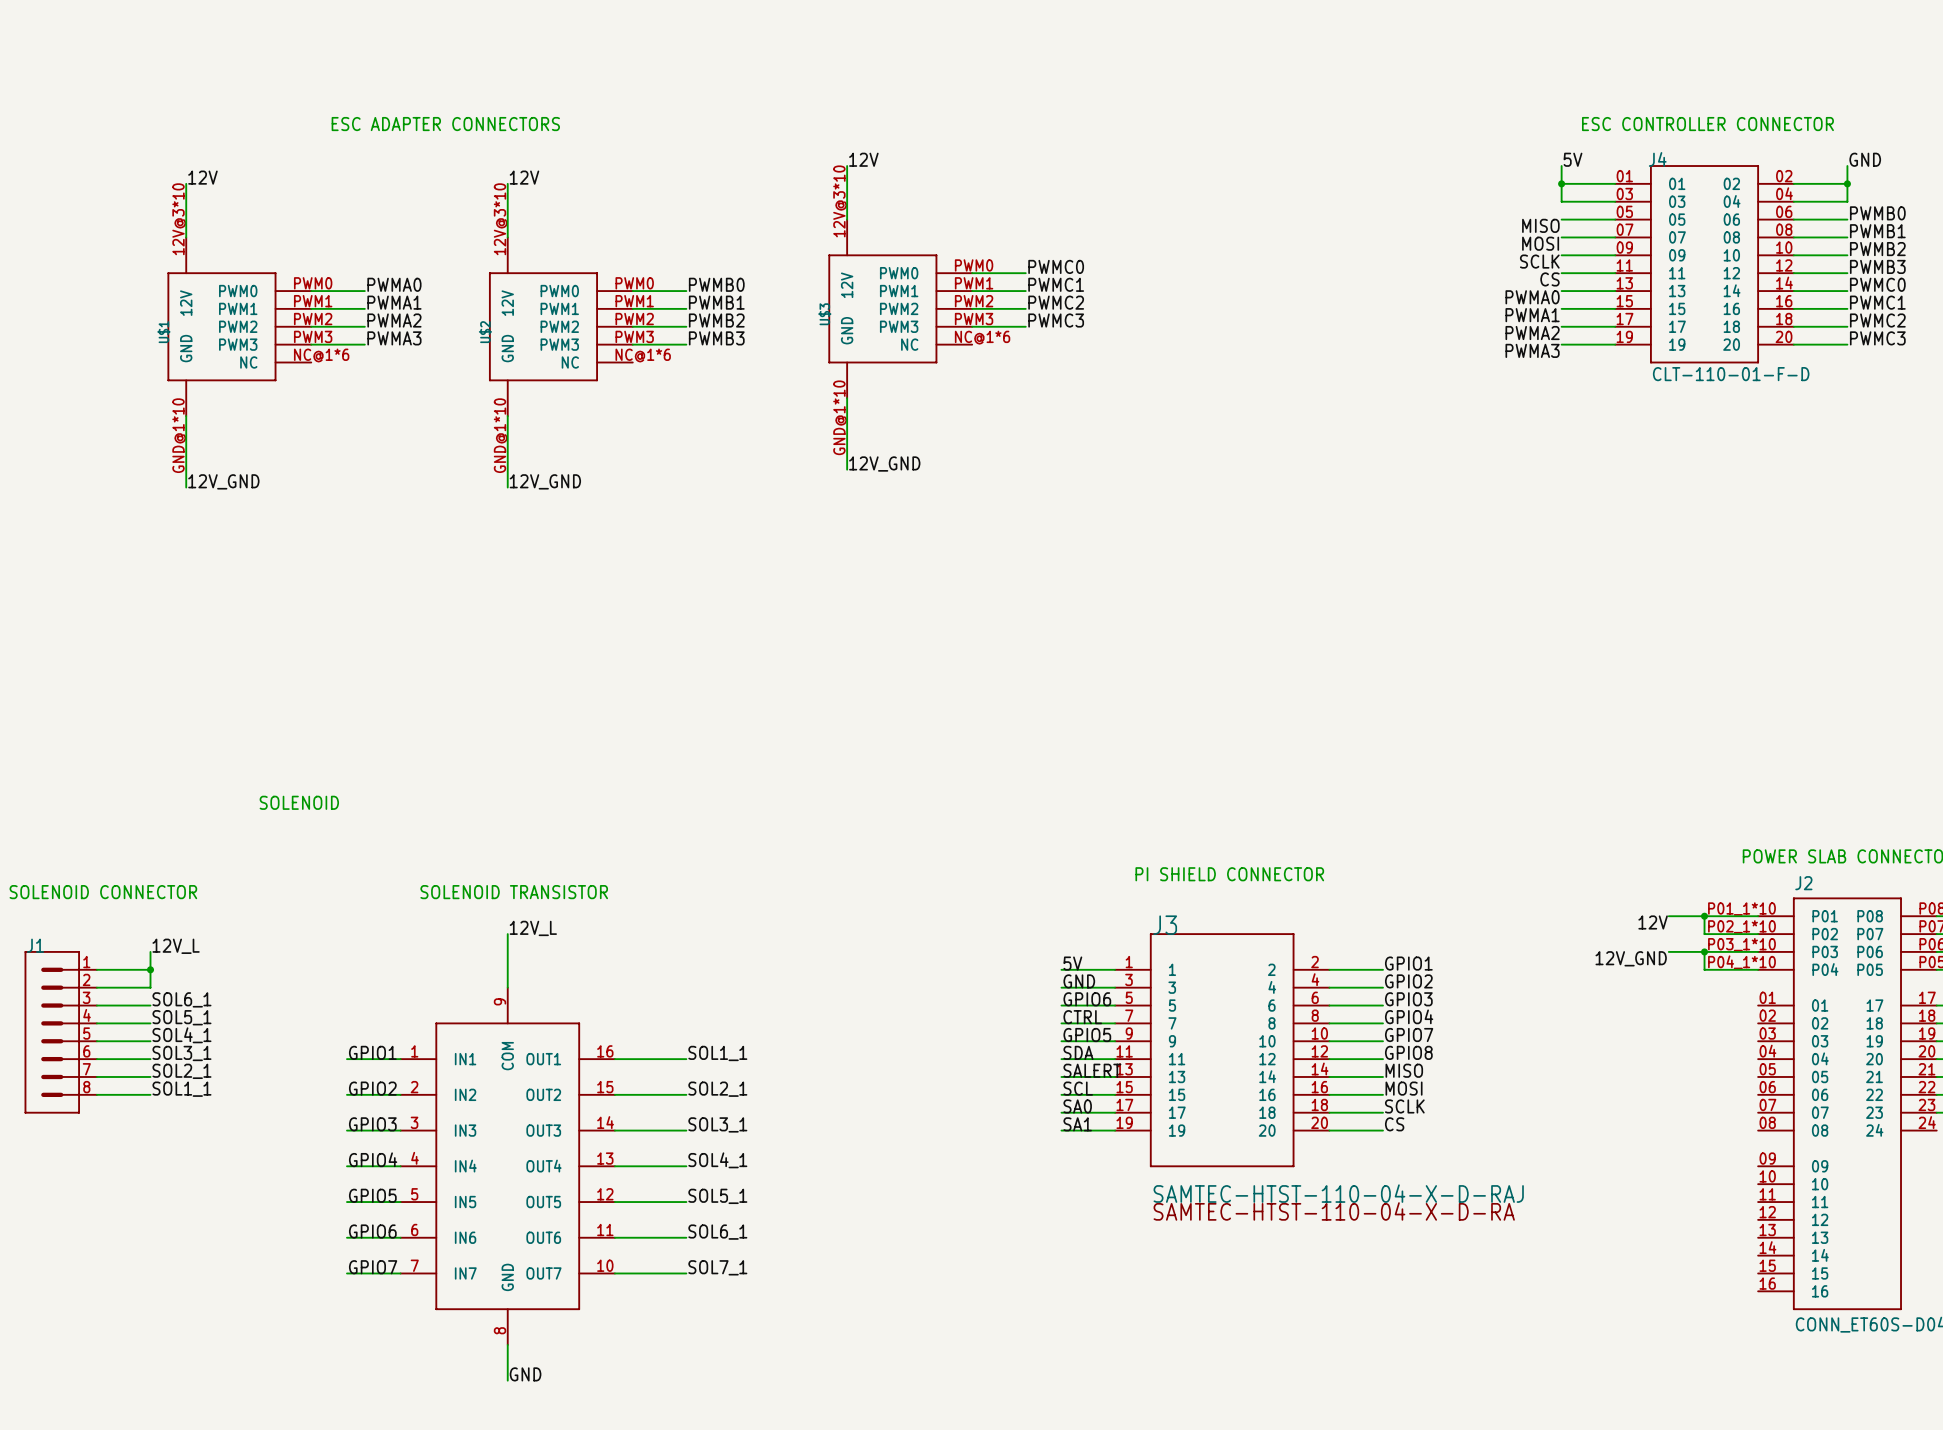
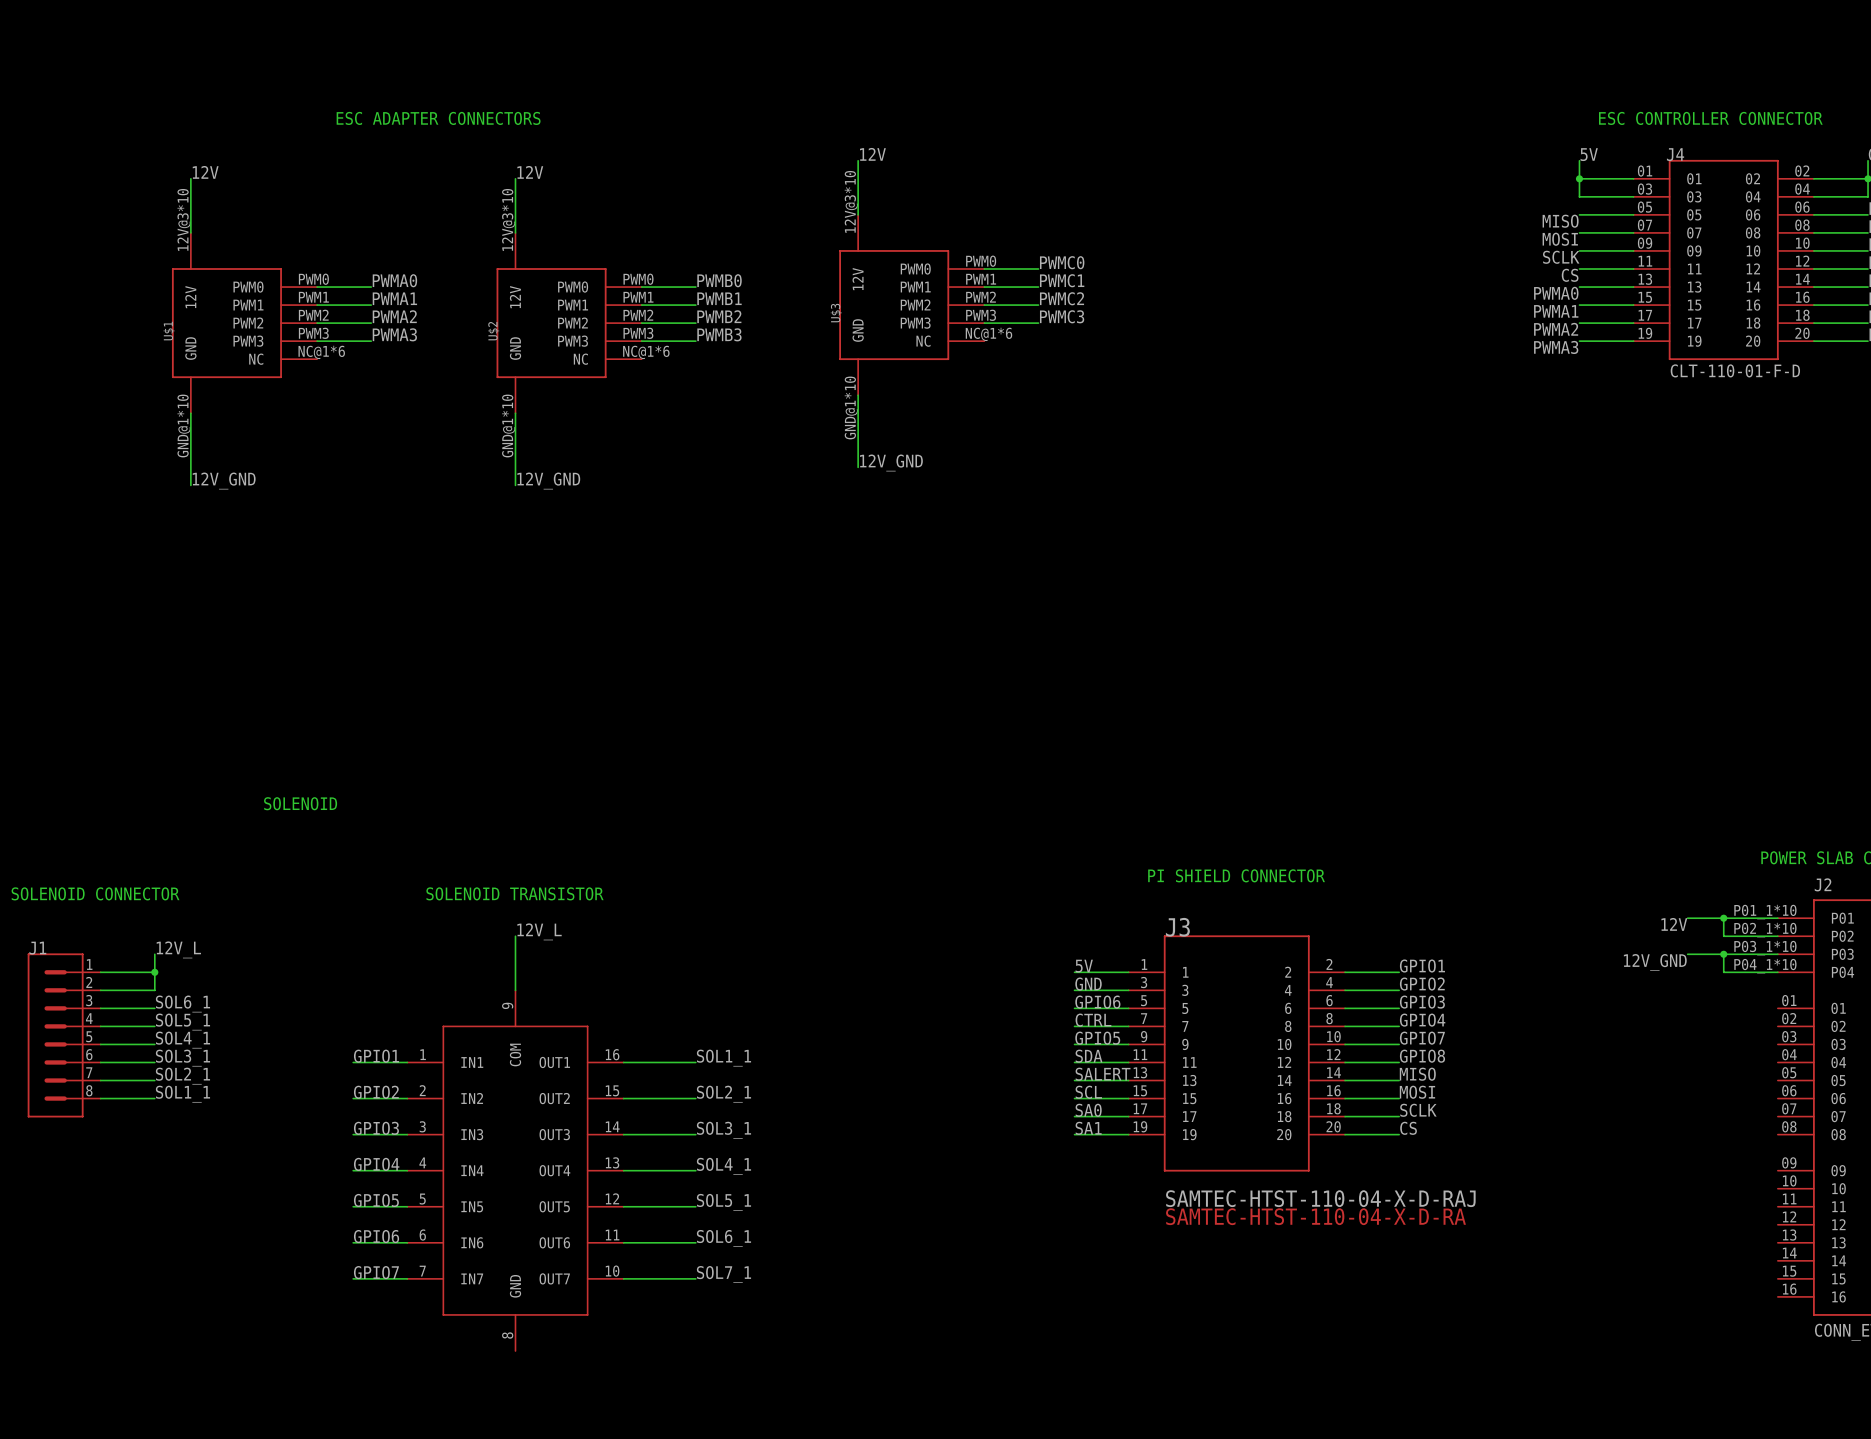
wire: (507, 1344) (507, 1380) -> none
label: GND (525, 1374) -> none

